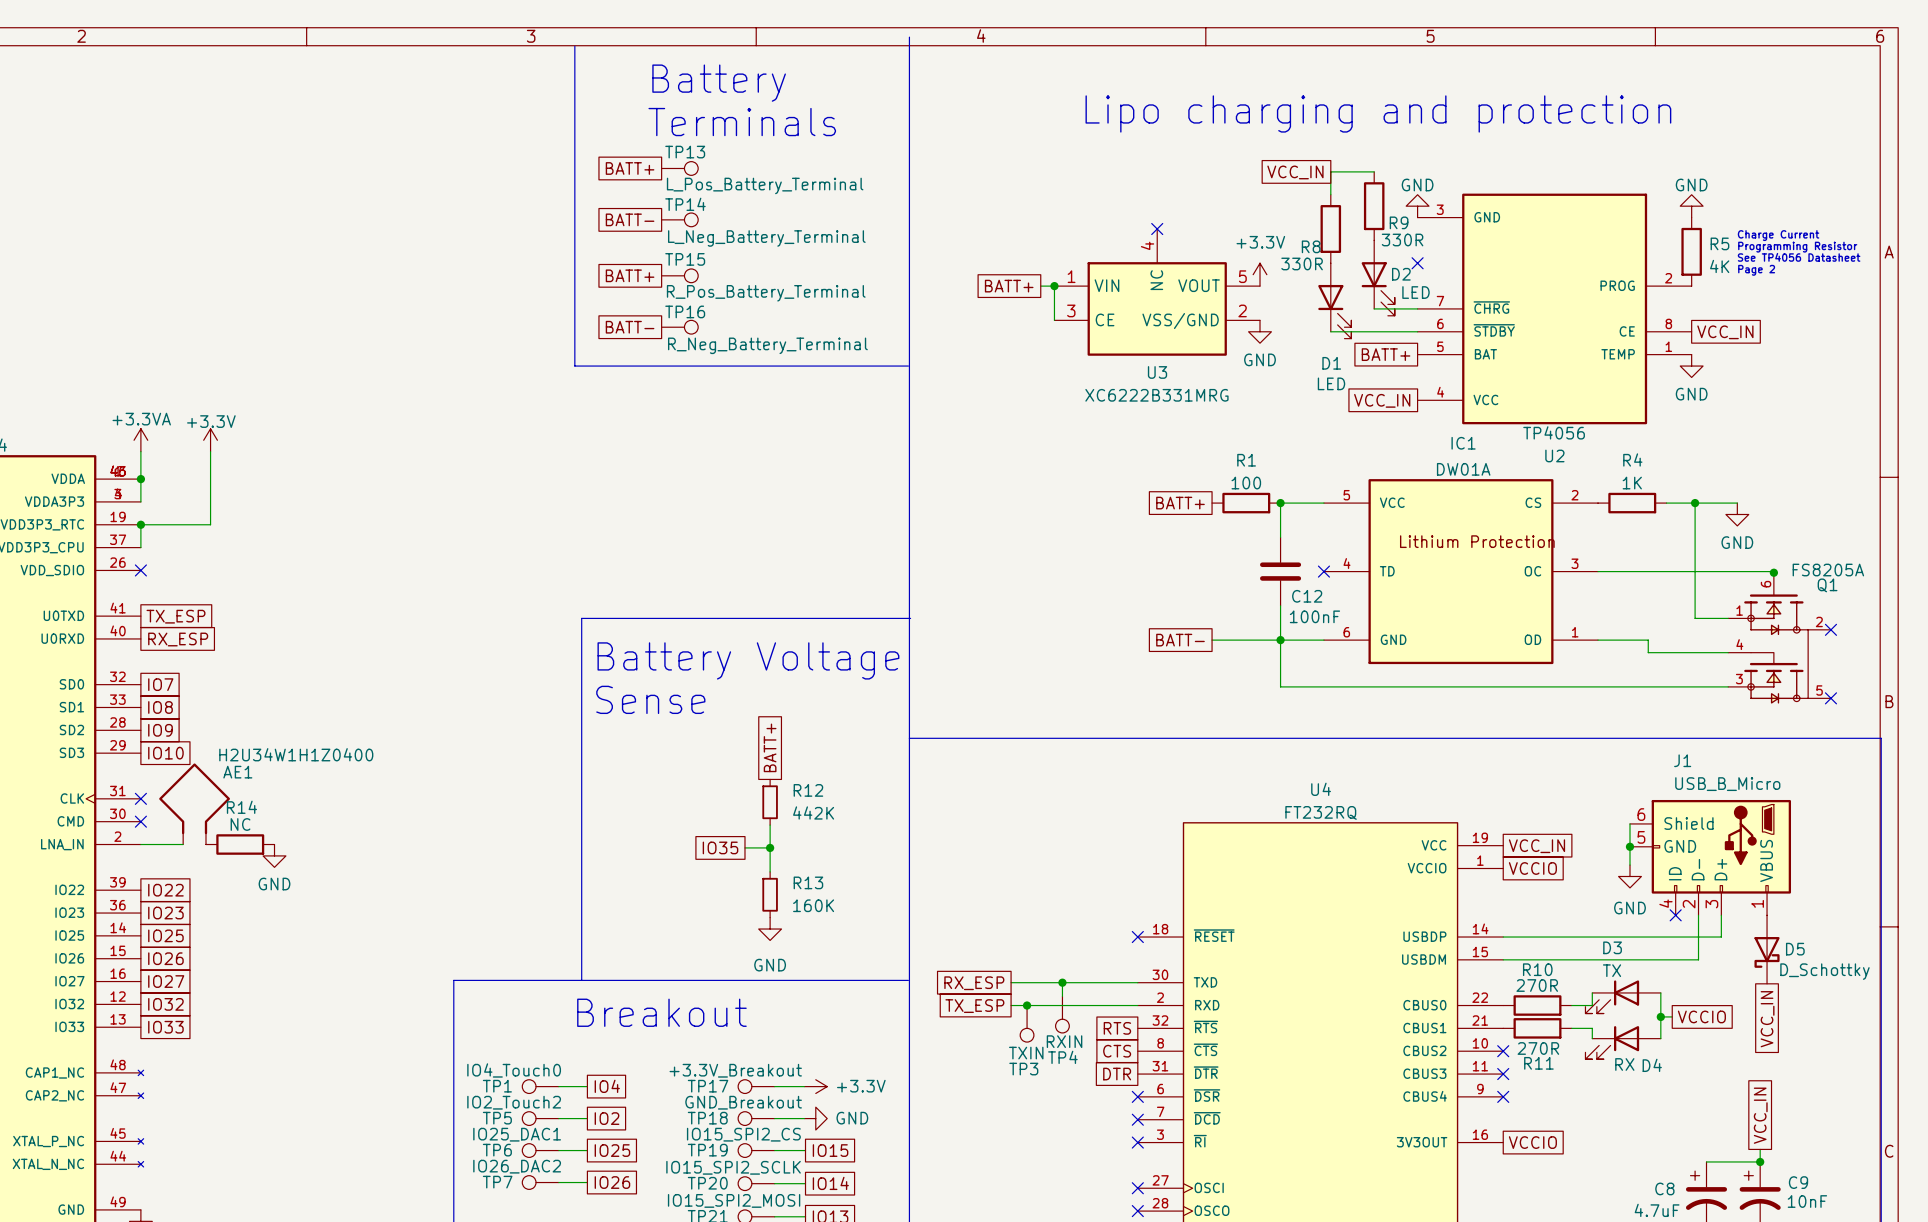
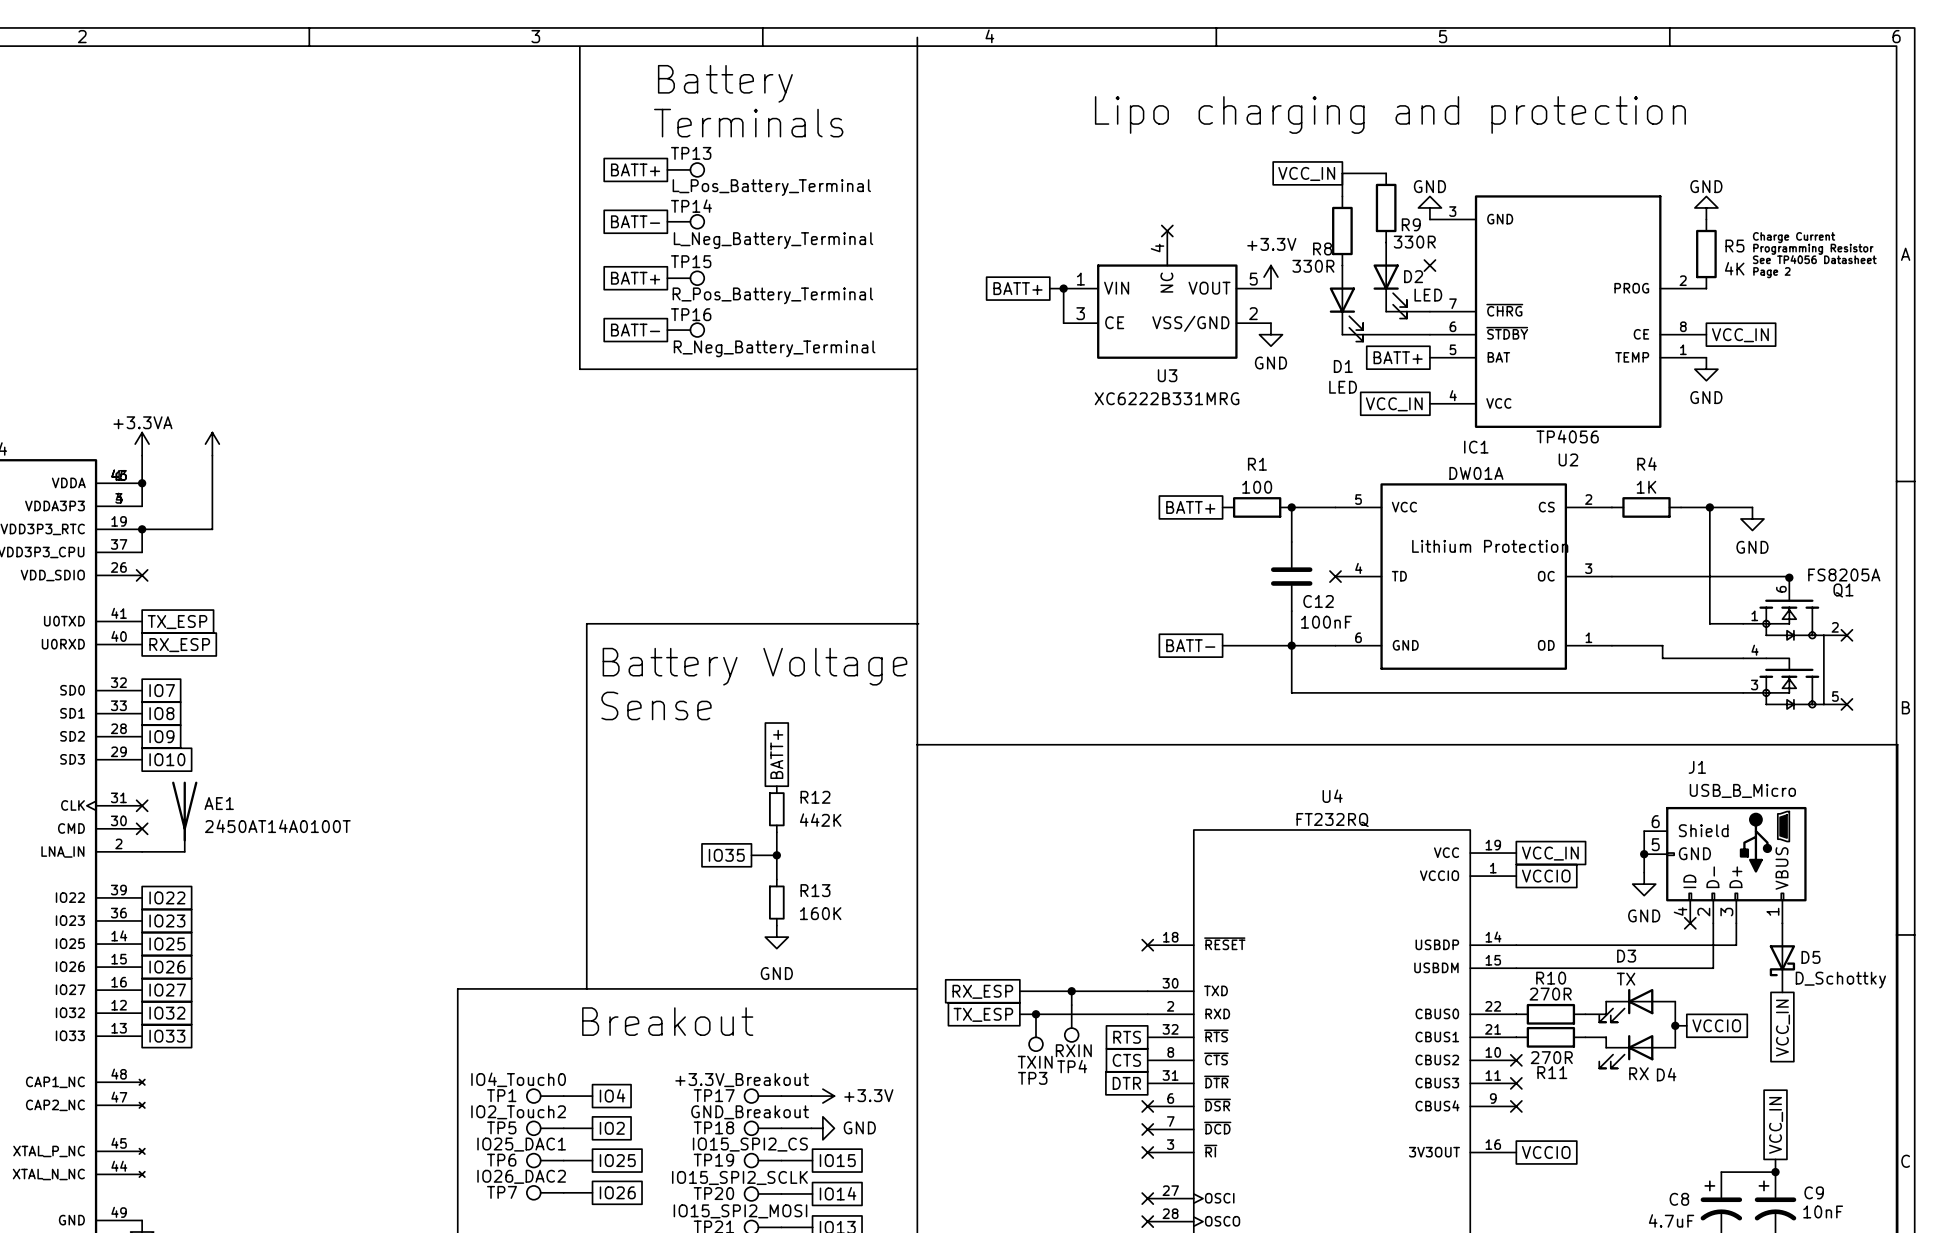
power symbol text: +3.3V (211, 421) -> none
AE1 value: H2U34W1H1Z0400 (296, 754) -> 2450AT14A0100T (277, 826)
AE1 symbol: [159, 763, 230, 845] -> [172, 781, 198, 852]
AE1 name position: AE1 (237, 772) -> AE1 (219, 803)
R14: NC (240, 844) -> none
power symbol: GND (274, 855) -> none

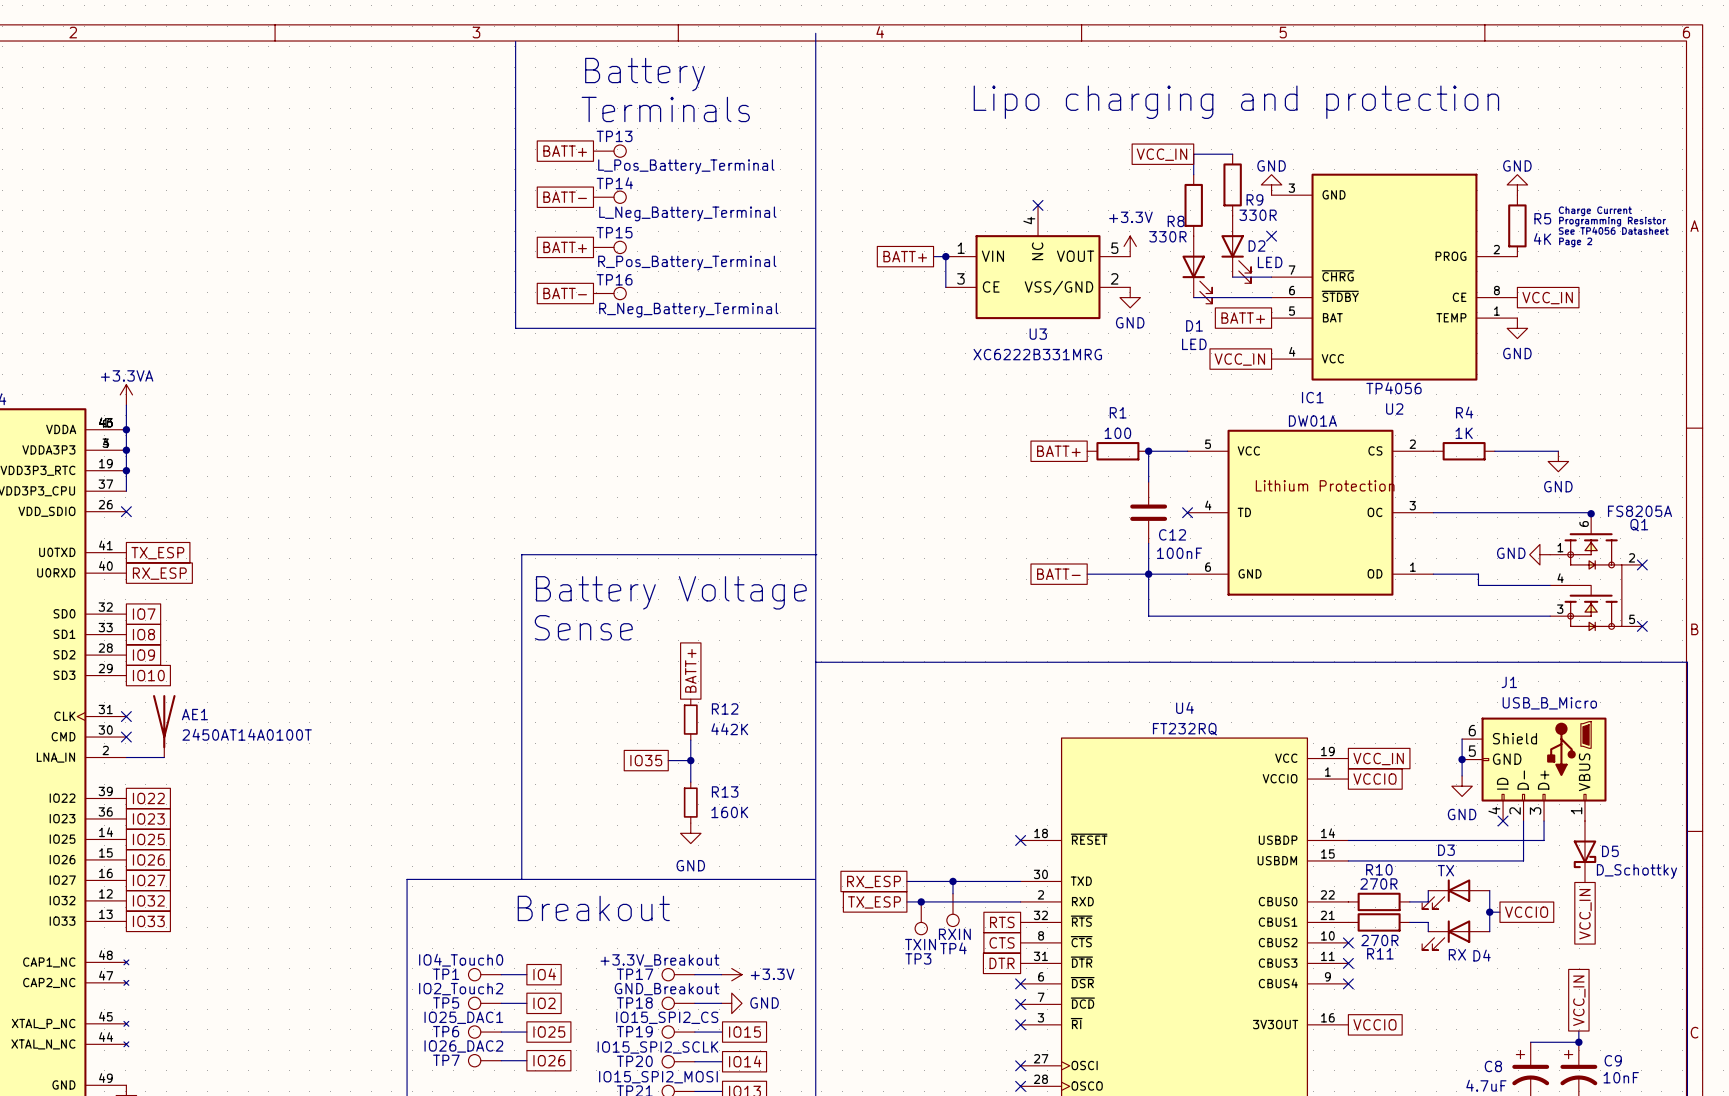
power symbol: (212, 444) -> none
wire: (212, 455) (212, 529) (142, 529) -> (126, 450) (126, 470)
junction: none -> (126, 450)
wire: (1709, 507) (1709, 623) (1743, 623) -> none
junction: (1709, 507) -> none
power symbol: none -> GND (1539, 554)

